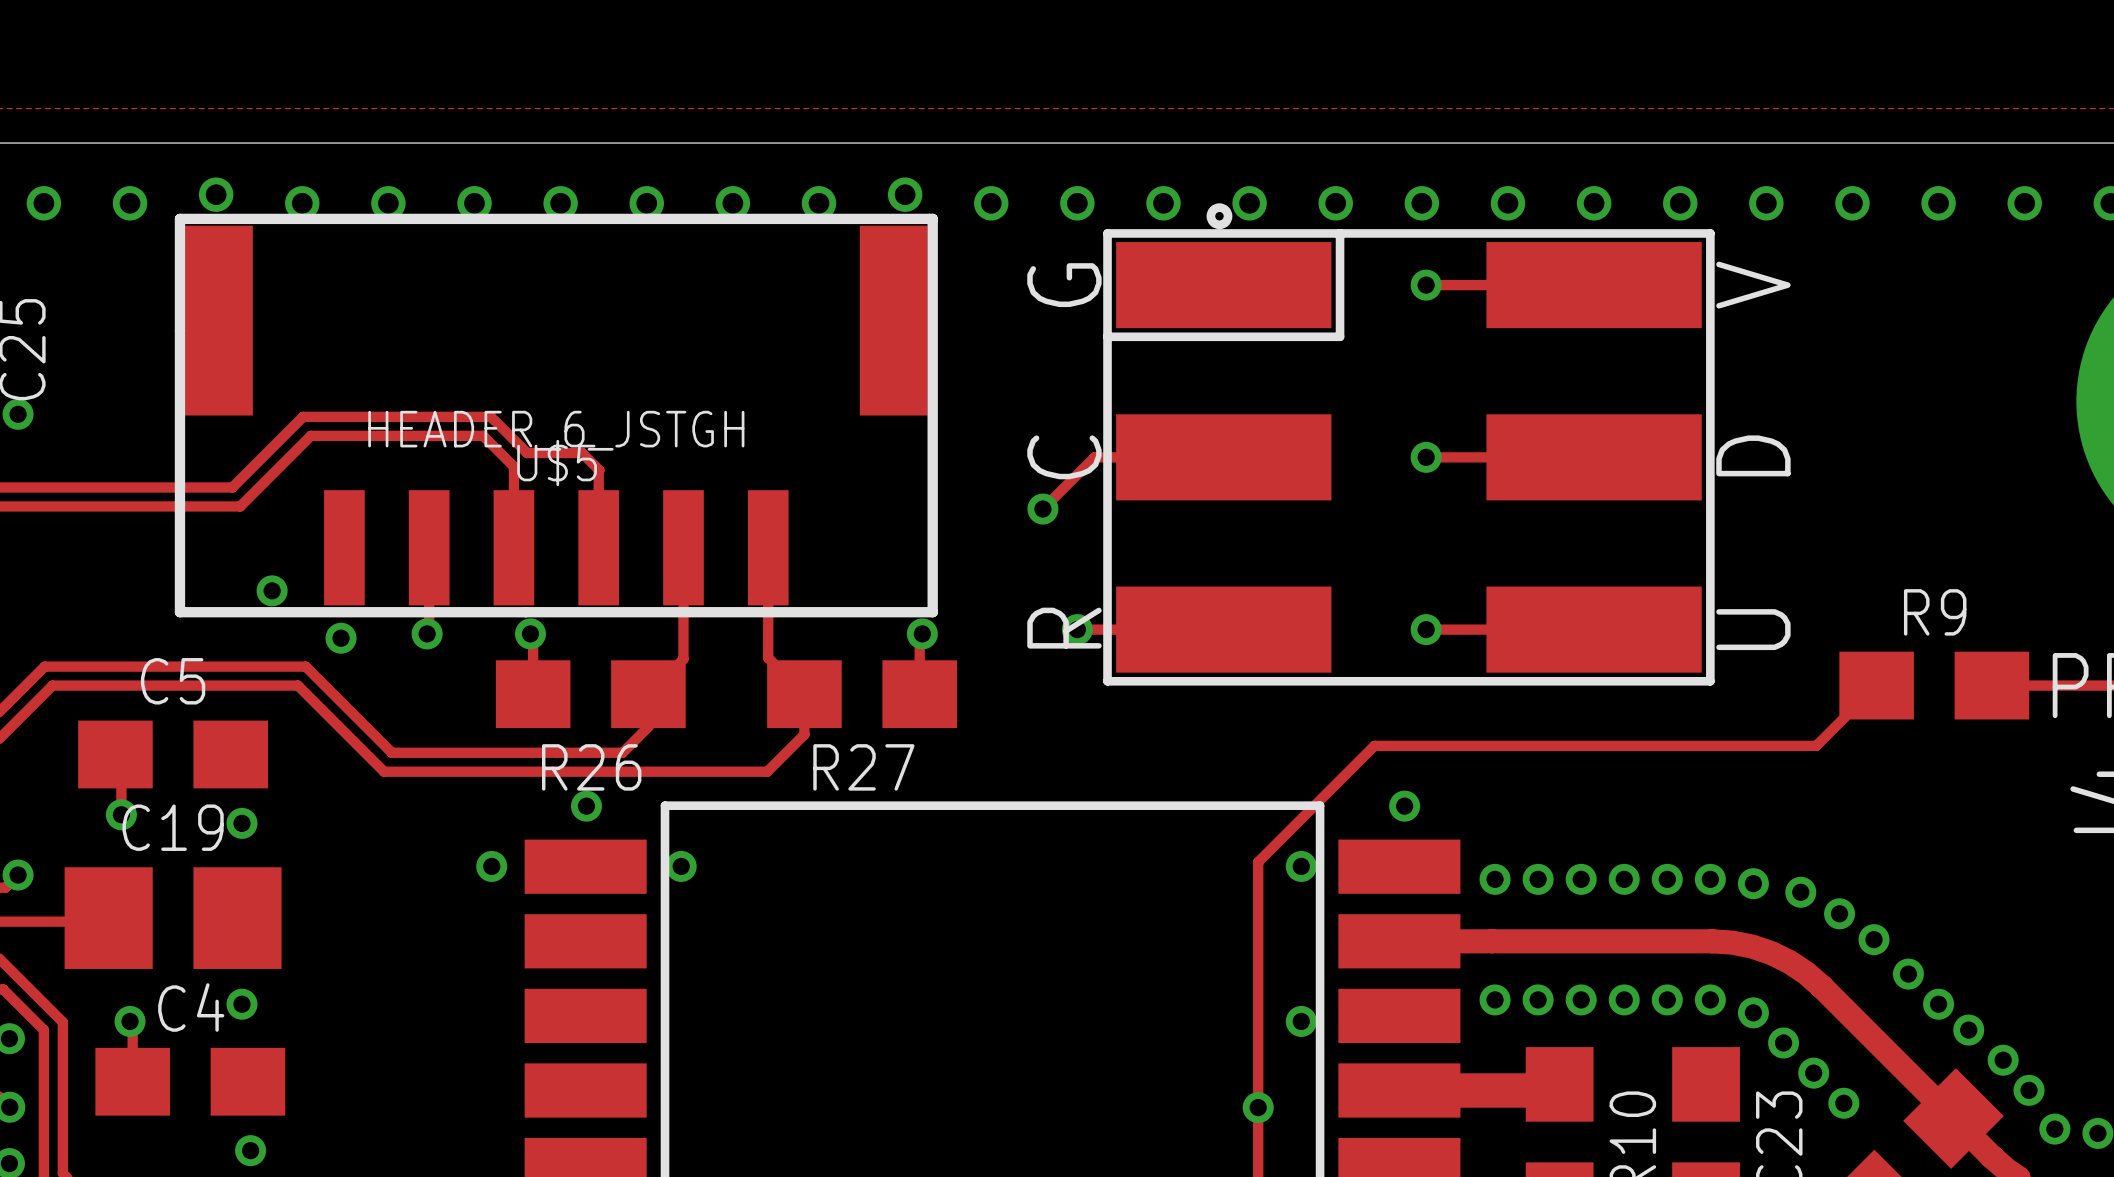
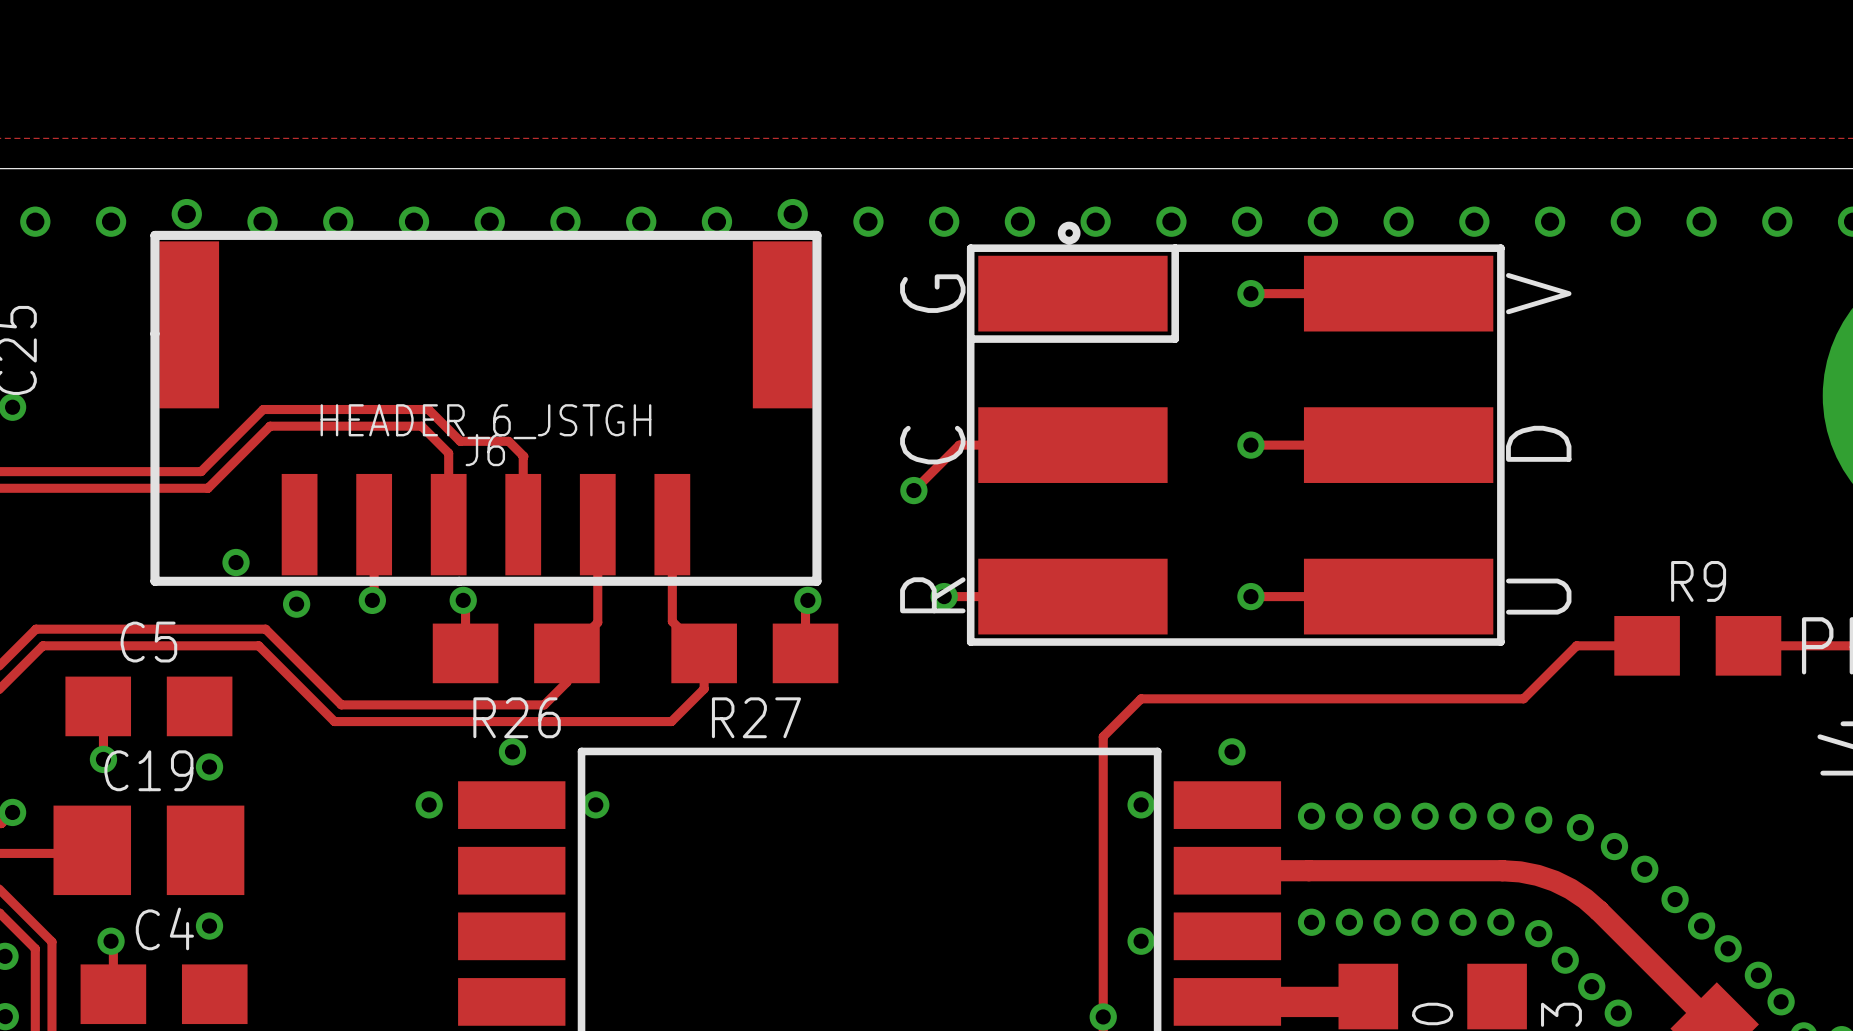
U$5 name: U$5 (557, 463) -> J6 (485, 450)
track: (1876, 685) (1816, 745) (1736, 745) -> (1647, 645) (1576, 645) (1523, 698)
track: (1374, 745) (1258, 862) -> (1205, 698) (1141, 698) (1103, 736) (1103, 801)

